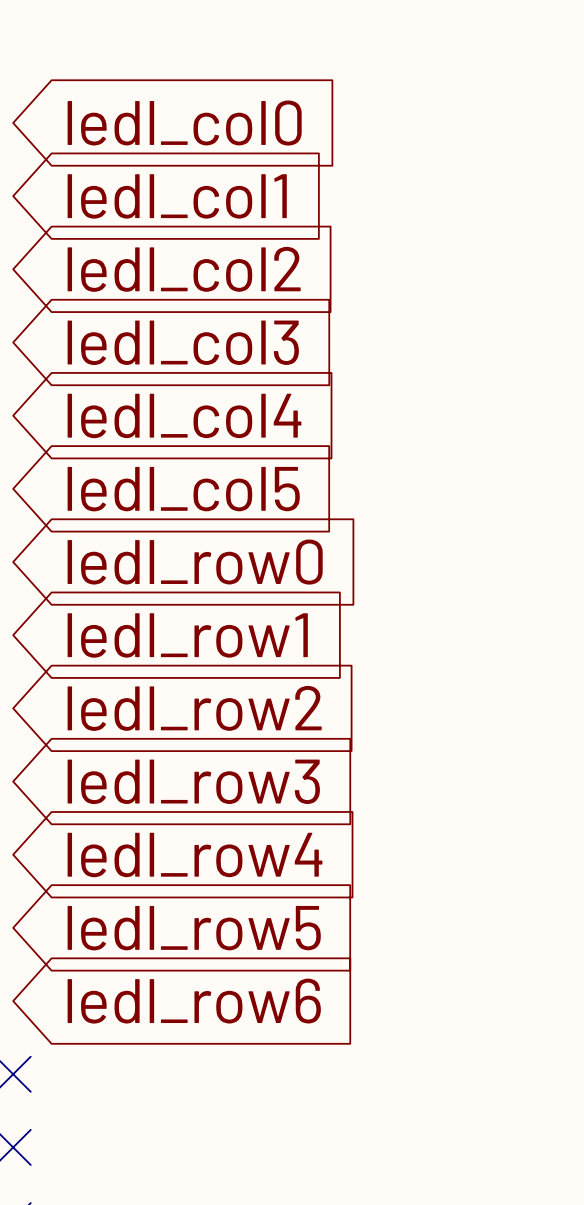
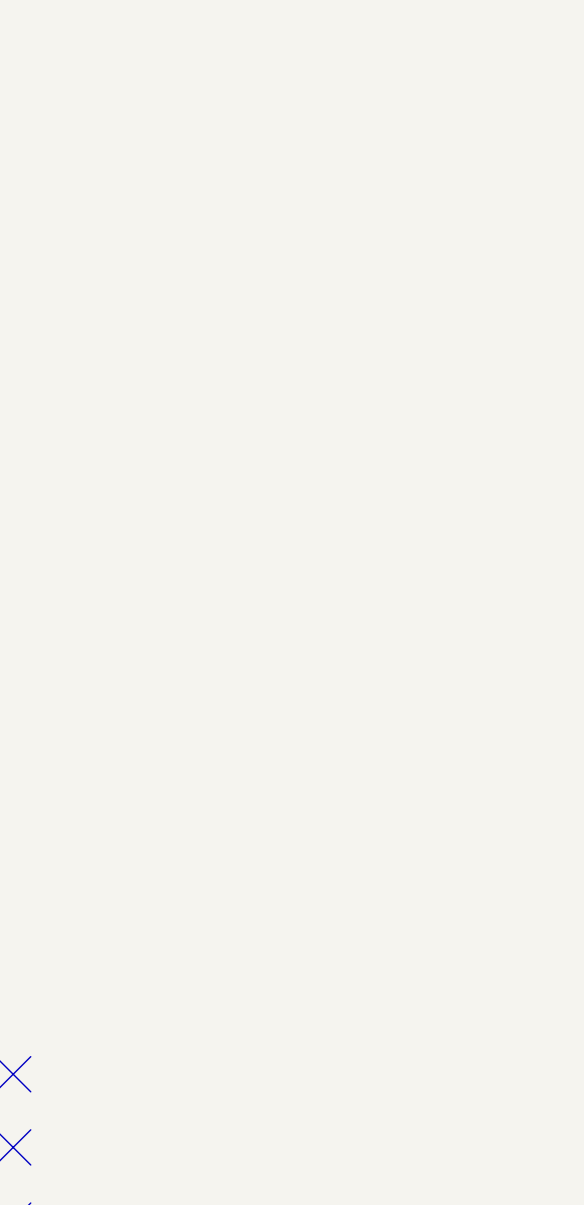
global label: ledl_col0 (184, 123) -> none
global label: ledl_col1 (177, 196) -> none
global label: ledl_col2 (184, 269) -> none
global label: ledl_col3 (183, 342) -> none
global label: ledl_col4 (184, 415) -> none
global label: ledl_col5 (183, 489) -> none
global label: ledl_row0 (195, 562) -> none
global label: ledl_row1 (187, 635) -> none
global label: ledl_row2 (194, 708) -> none
global label: ledl_row3 (193, 781) -> none
global label: ledl_row4 (195, 855) -> none
global label: ledl_row5 (194, 928) -> none
global label: ledl_row6 (194, 1001) -> none

